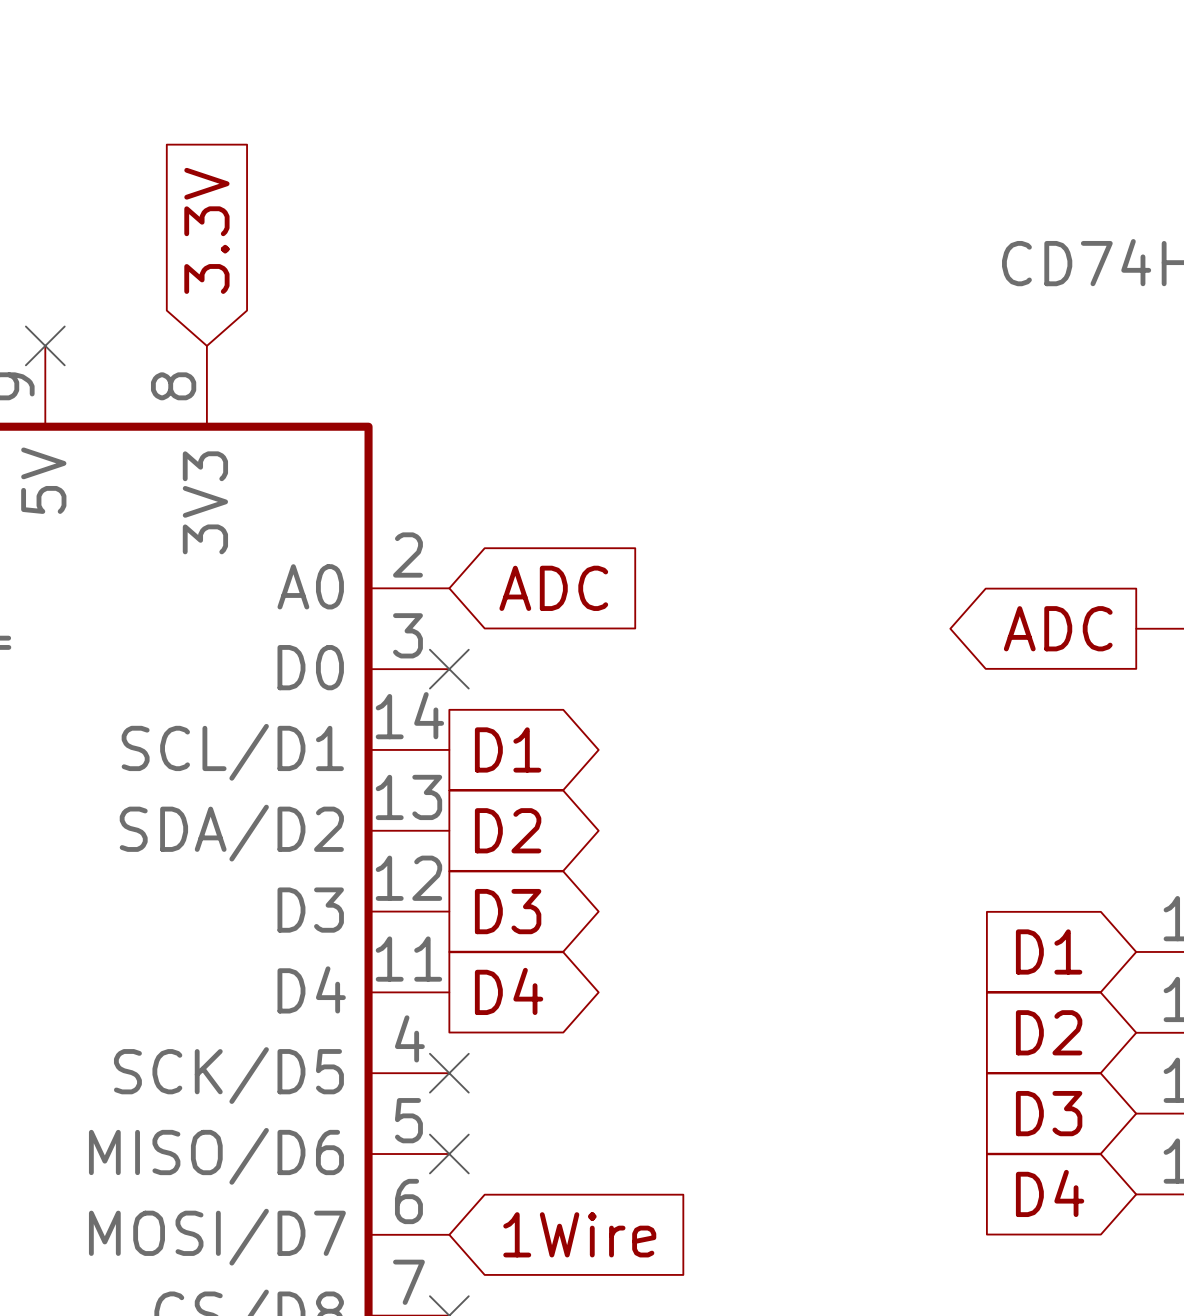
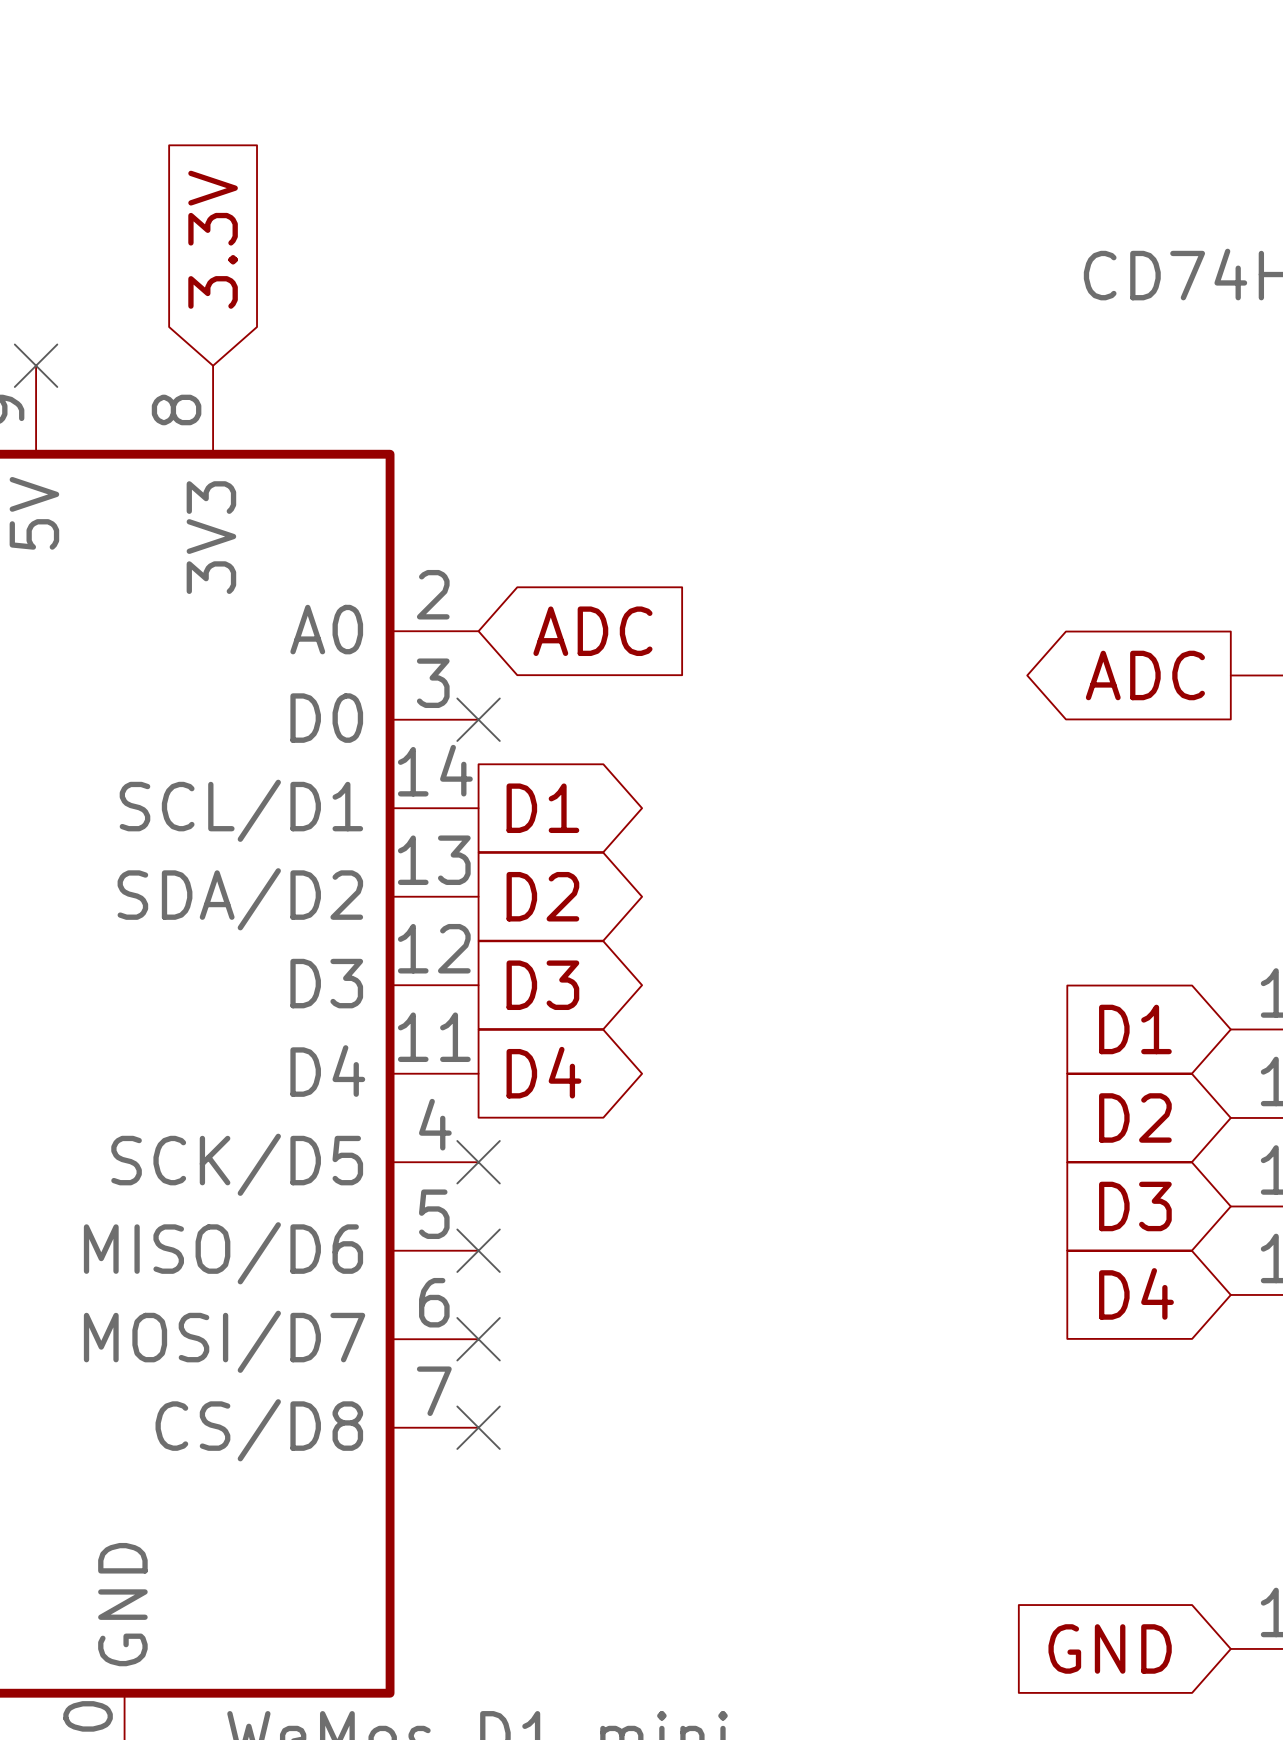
no-connect mark: none -> (478, 1339)
global label: 1Wire (579, 1234) -> none

